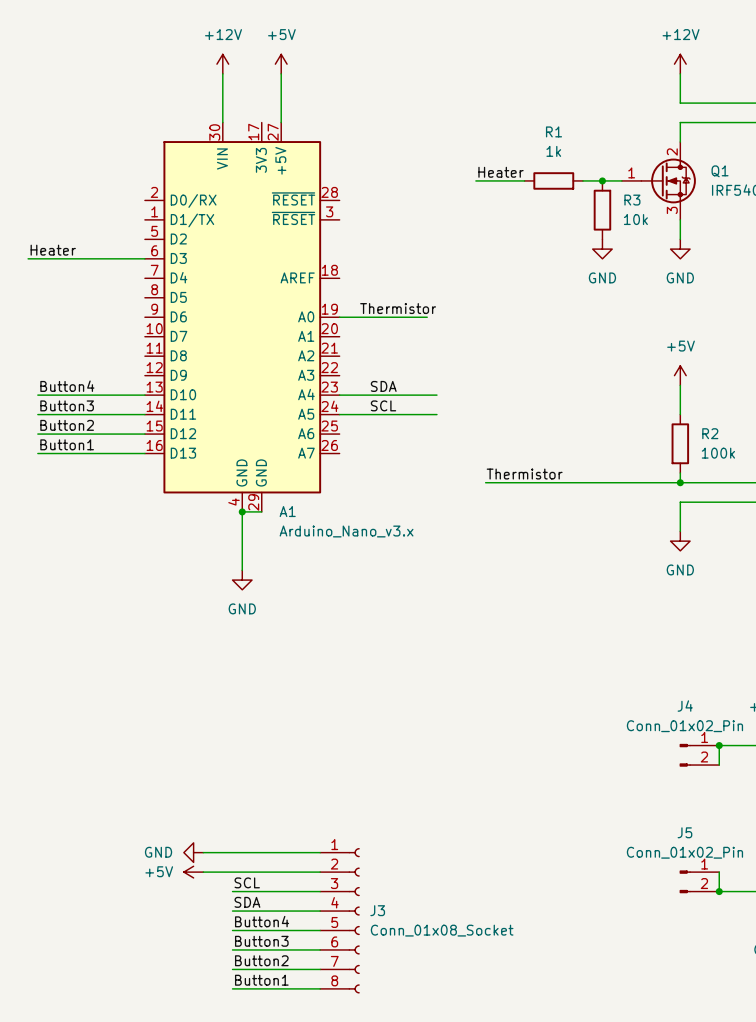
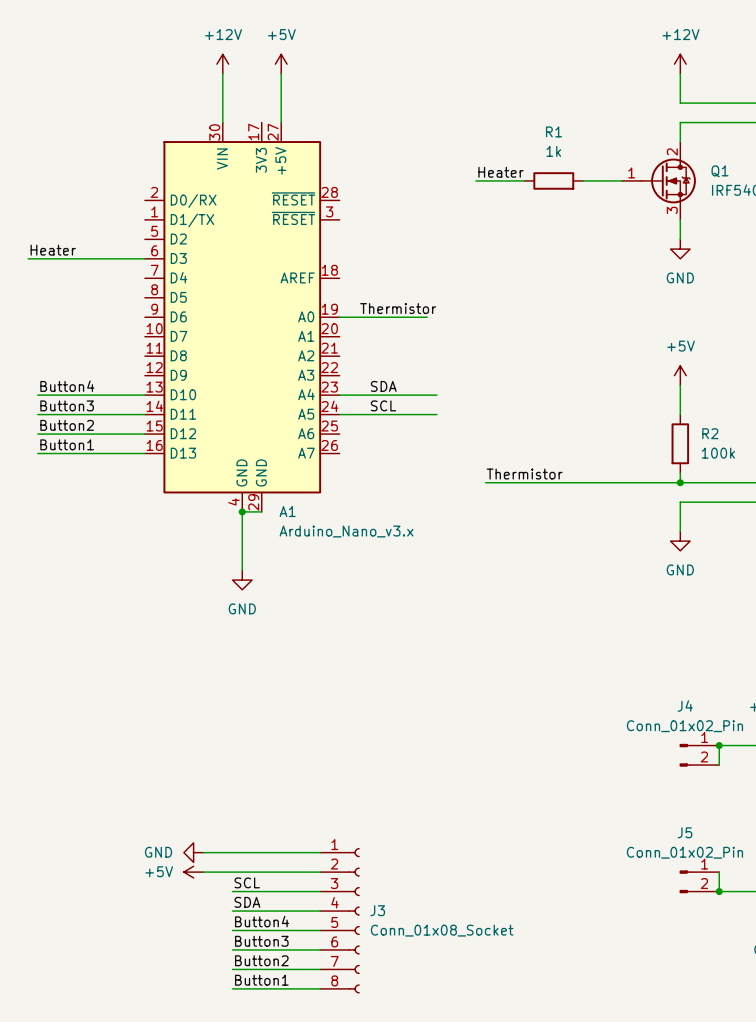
junction: (602, 180) -> none
R3: 10k (602, 210) -> none
power symbol: GND (602, 249) -> none

